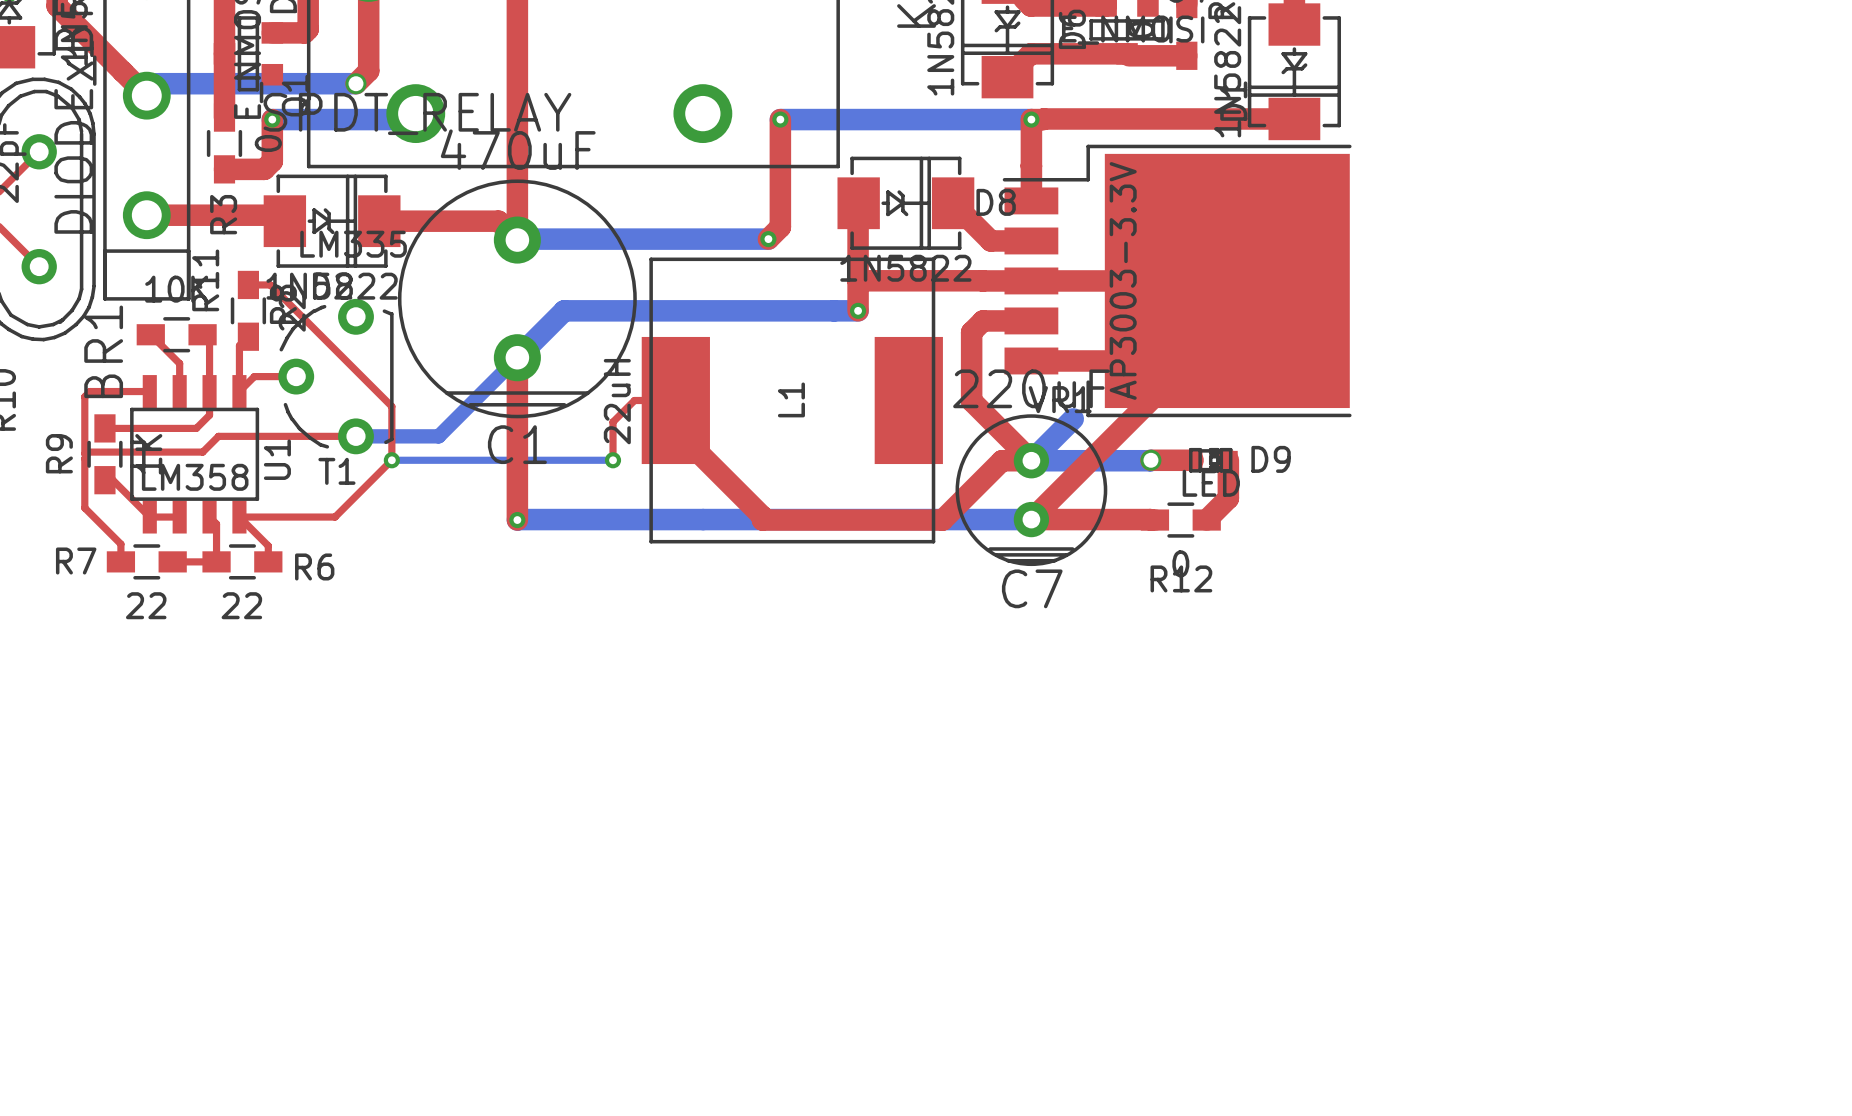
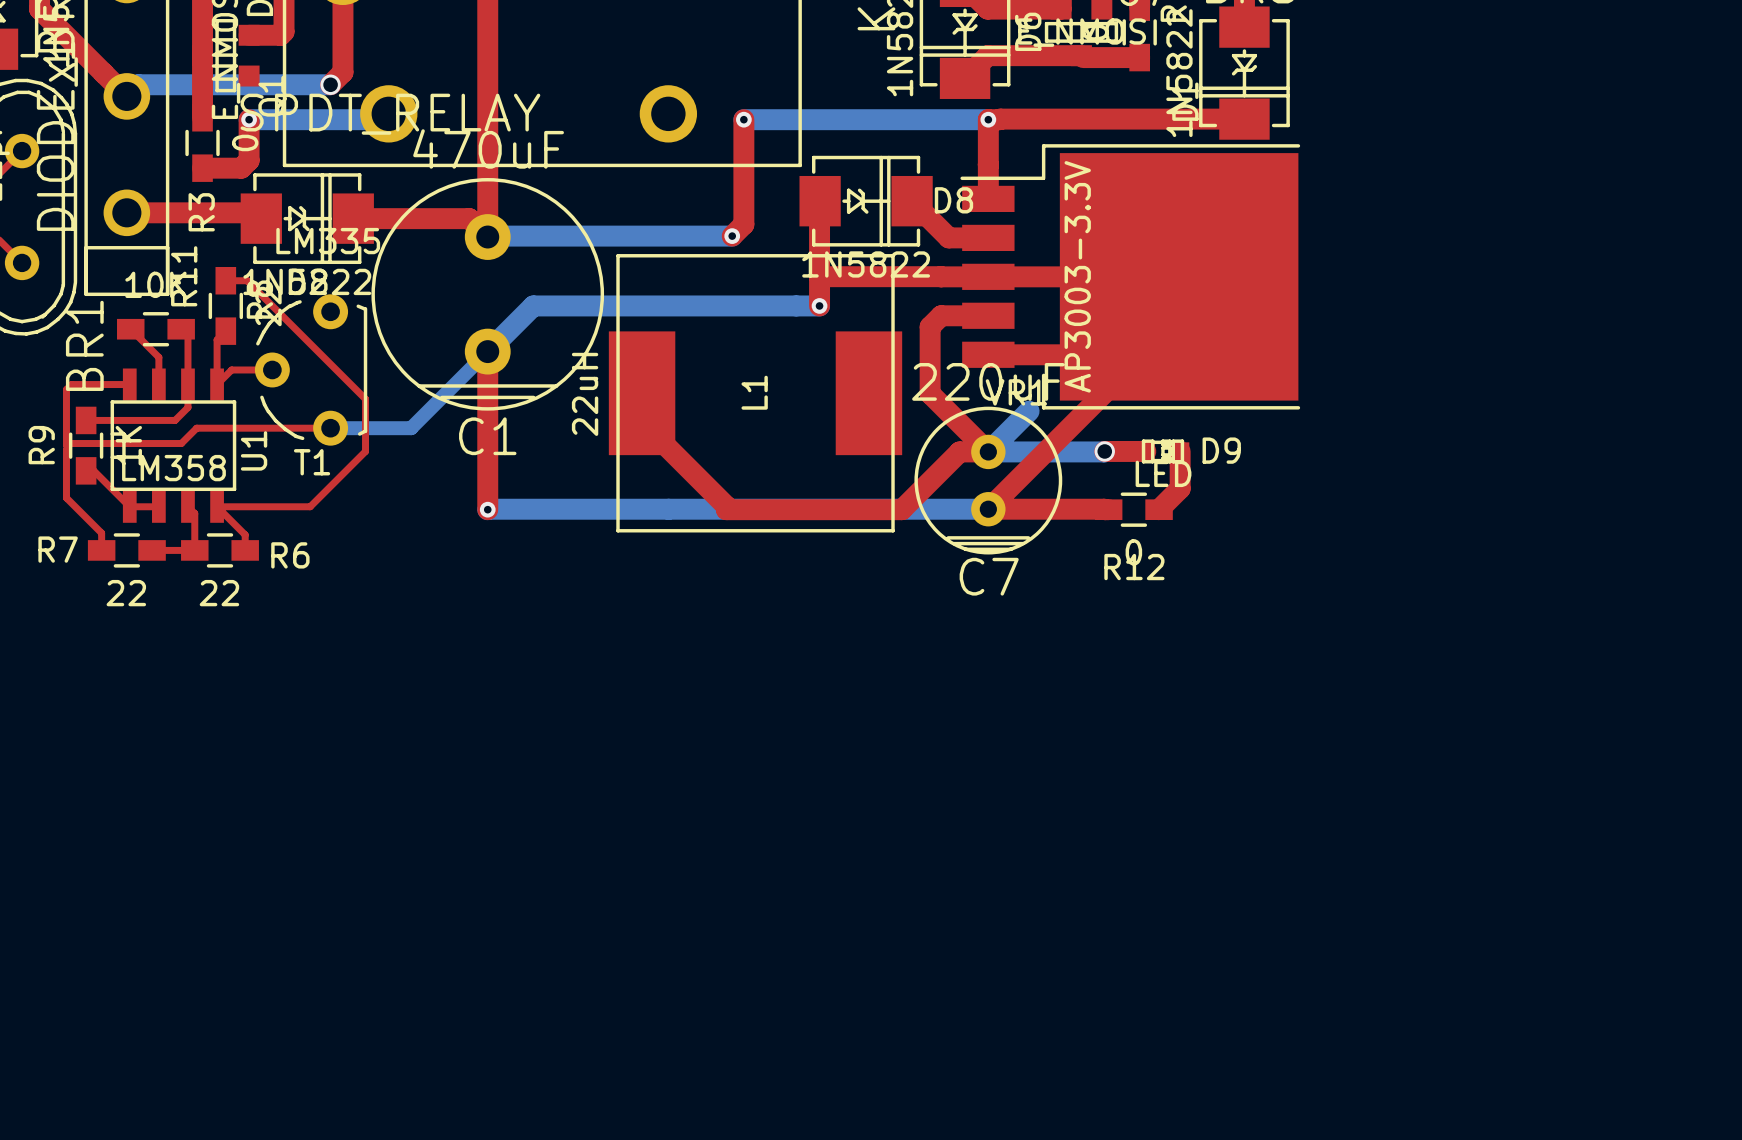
top track: (675, 400) (634, 400) (613, 422) (613, 460) -> none
bottom track: (391, 460) (613, 460) -> none
via: (391, 460) -> none
via: (613, 460) -> none

